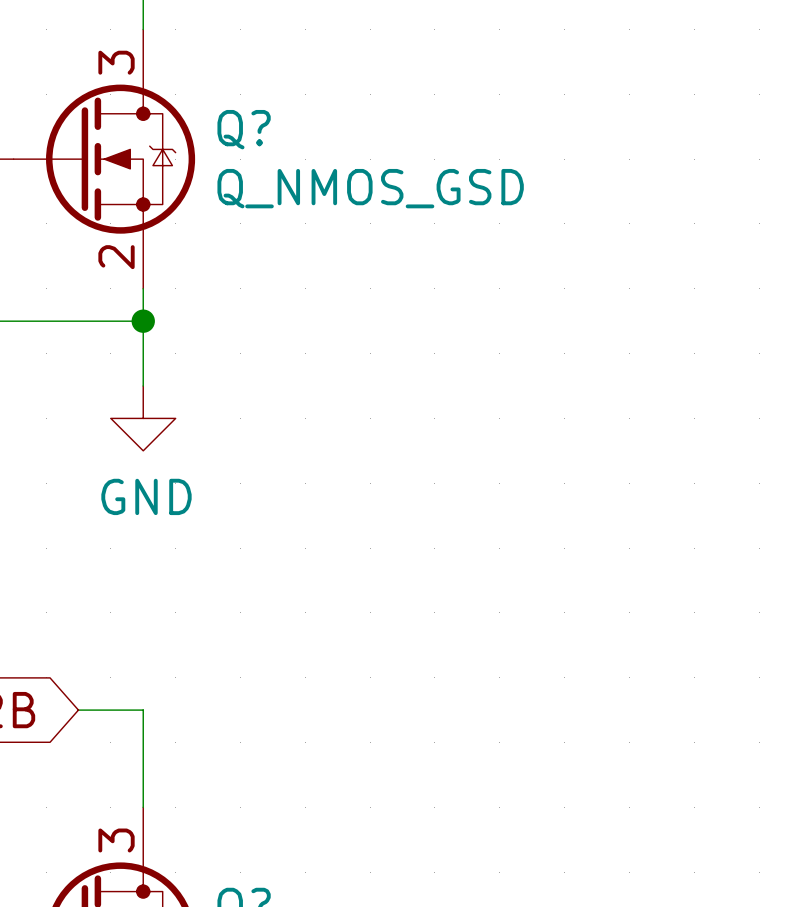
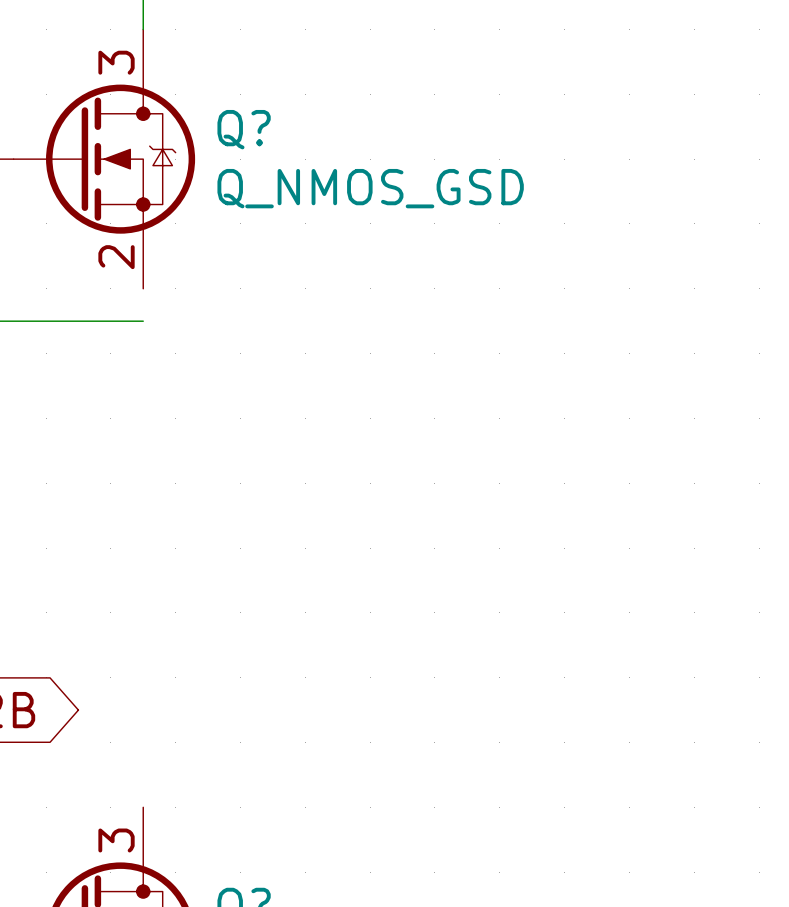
wire: (143, 288) (143, 386) -> none
junction: (143, 321) -> none
power symbol: GND (143, 418) -> none
wire: (78, 710) (143, 710) (143, 807) -> none

